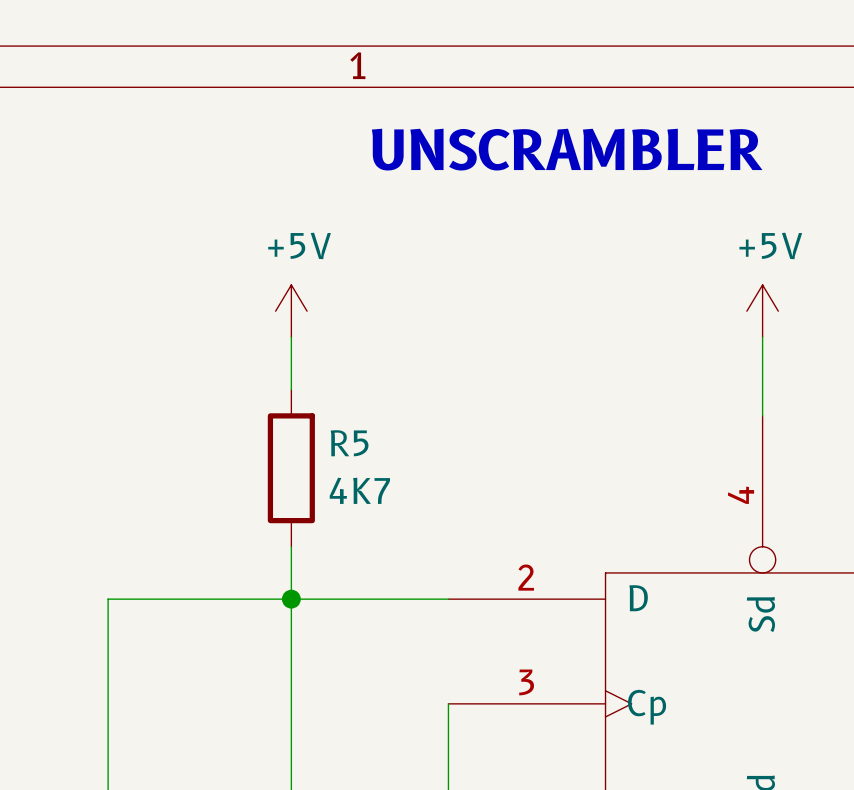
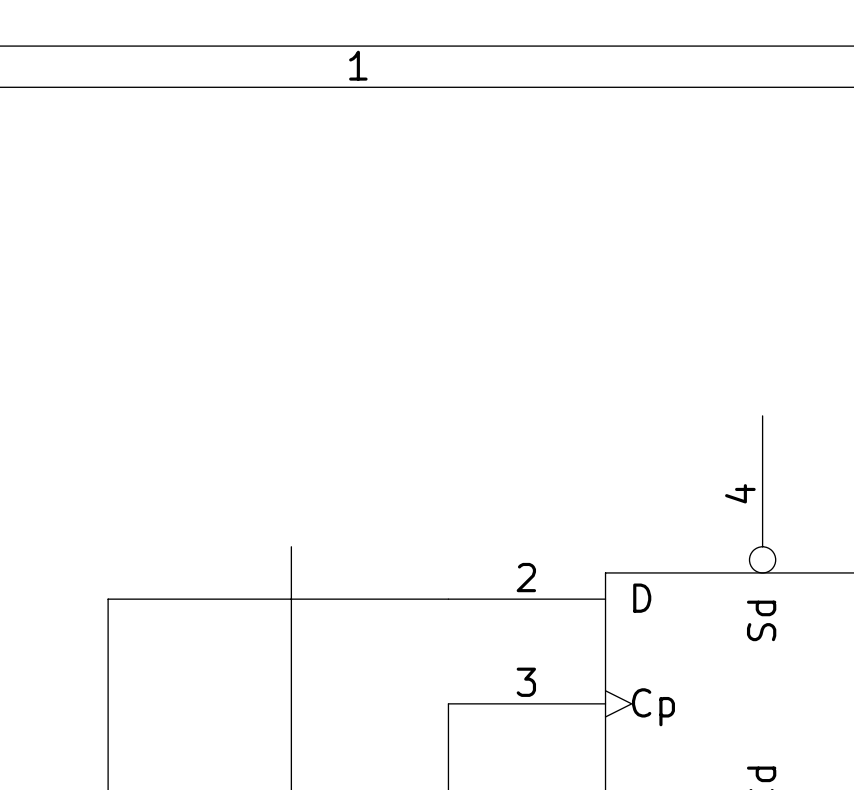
text: UNSCRAMBLER (567, 149) -> none
power symbol: +5V (291, 311) -> none
power symbol: +5V (762, 311) -> none
wire: (291, 337) (291, 389) -> none
wire: (762, 337) (762, 415) -> none
R5: 4K7 (291, 468) -> none
junction: (291, 599) -> none

